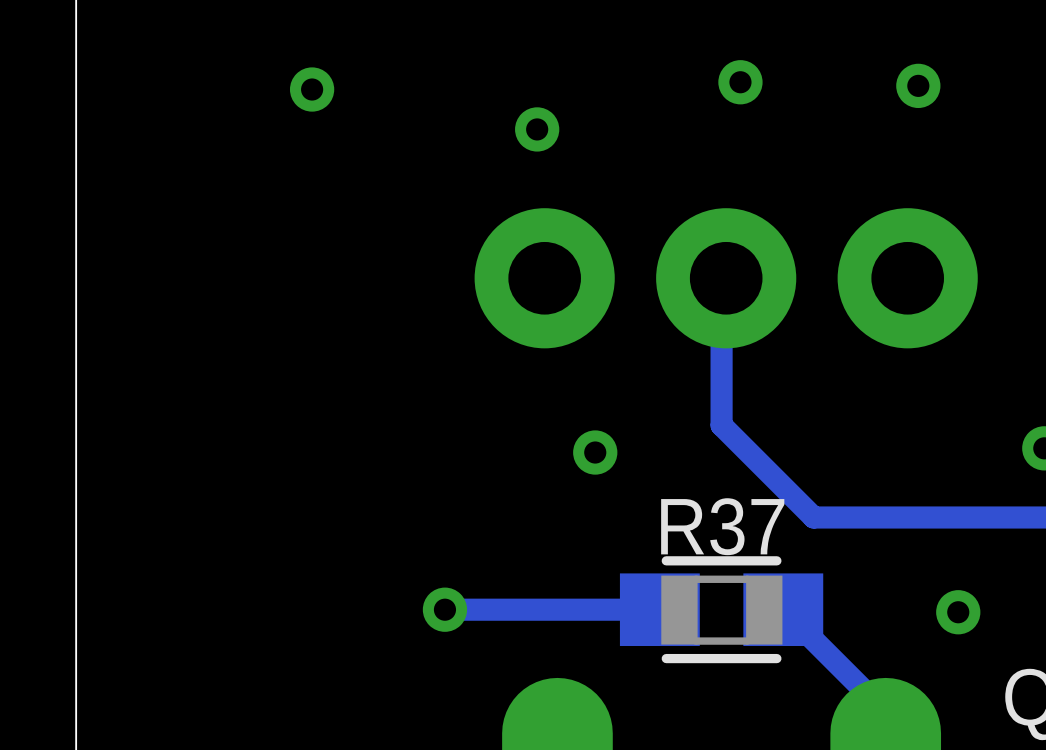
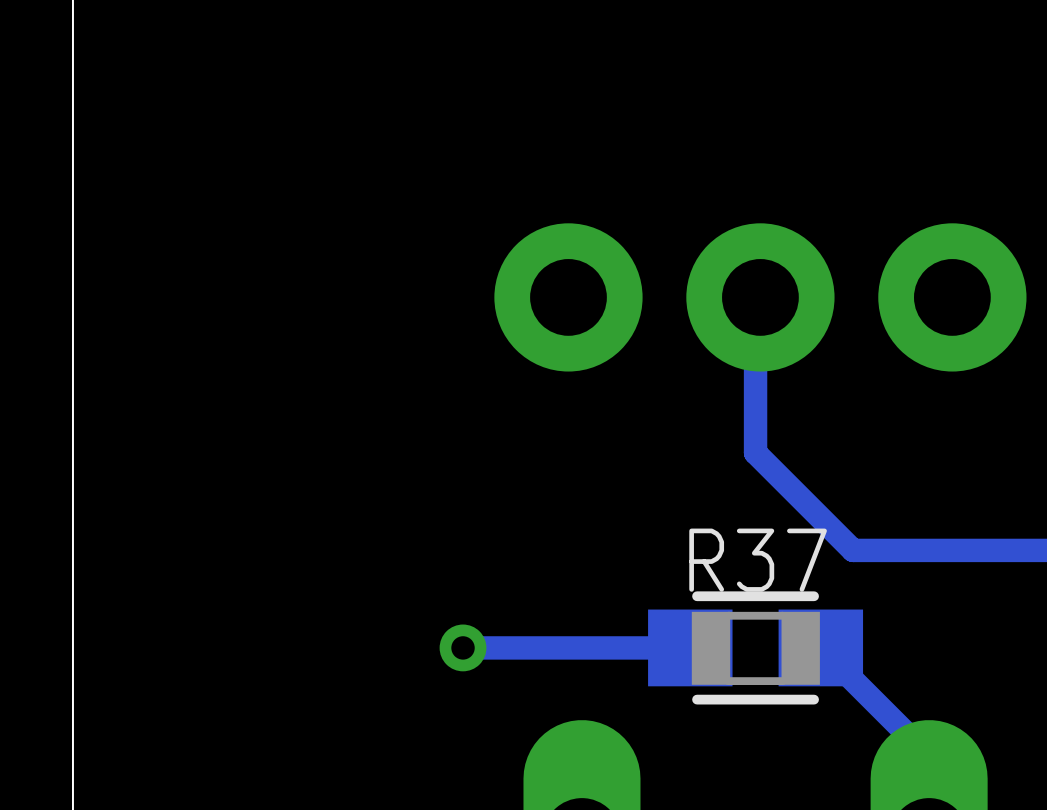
via: (740, 82) -> none
via: (918, 85) -> none
via: (312, 89) -> none
via: (537, 129) -> none
via: (595, 452) -> none
via: (958, 612) -> none

